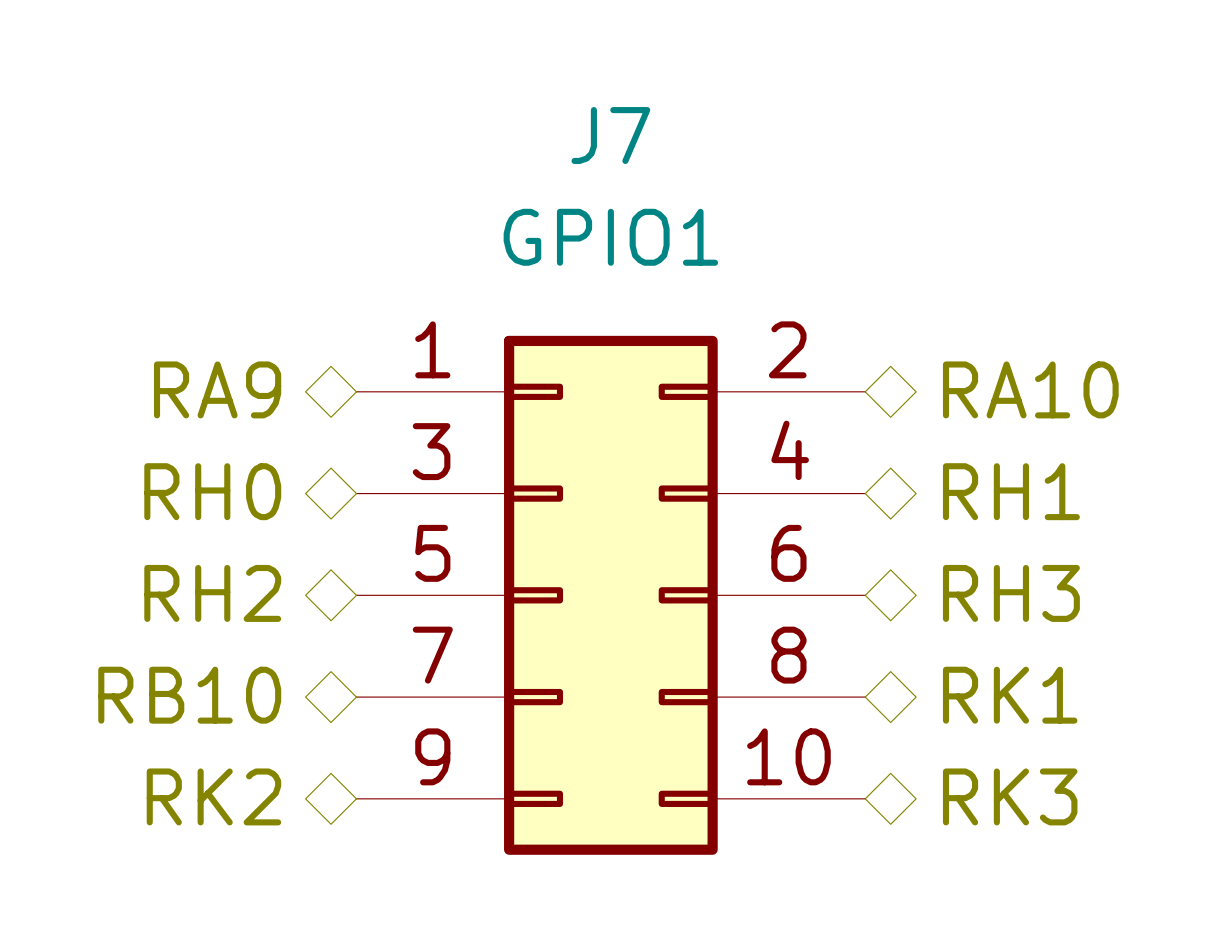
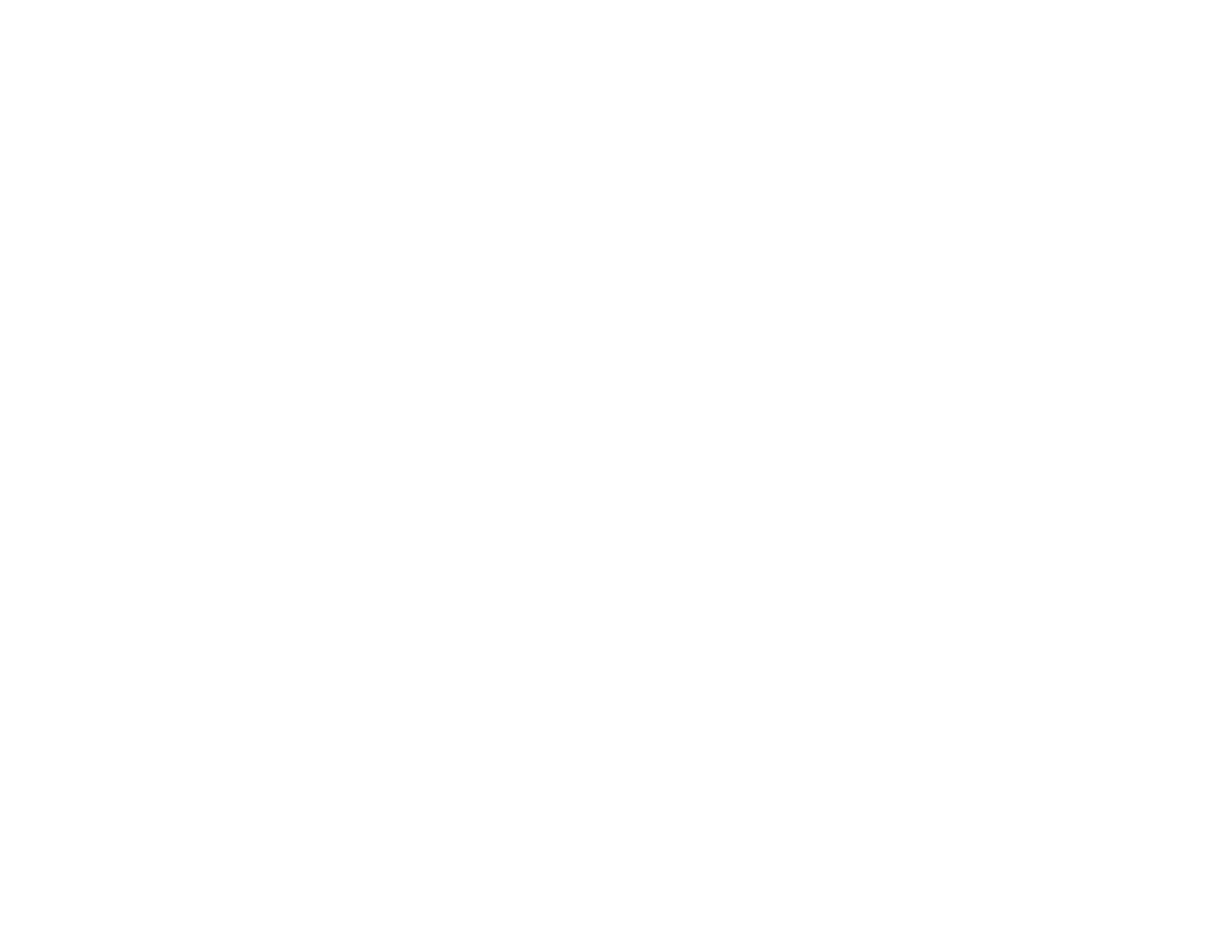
hierarchical label: RA9 (217, 389) -> none
hierarchical label: RA10 (1030, 389) -> none
hierarchical label: RH0 (212, 491) -> none
hierarchical label: RH1 (1011, 491) -> none
hierarchical label: RH2 (212, 593) -> none
hierarchical label: RH3 (1011, 593) -> none
J7: GPIO1 (610, 595) -> none
hierarchical label: RB10 (189, 695) -> none
hierarchical label: RK1 (1010, 695) -> none
hierarchical label: RK2 (213, 796) -> none
hierarchical label: RK3 (1010, 796) -> none

